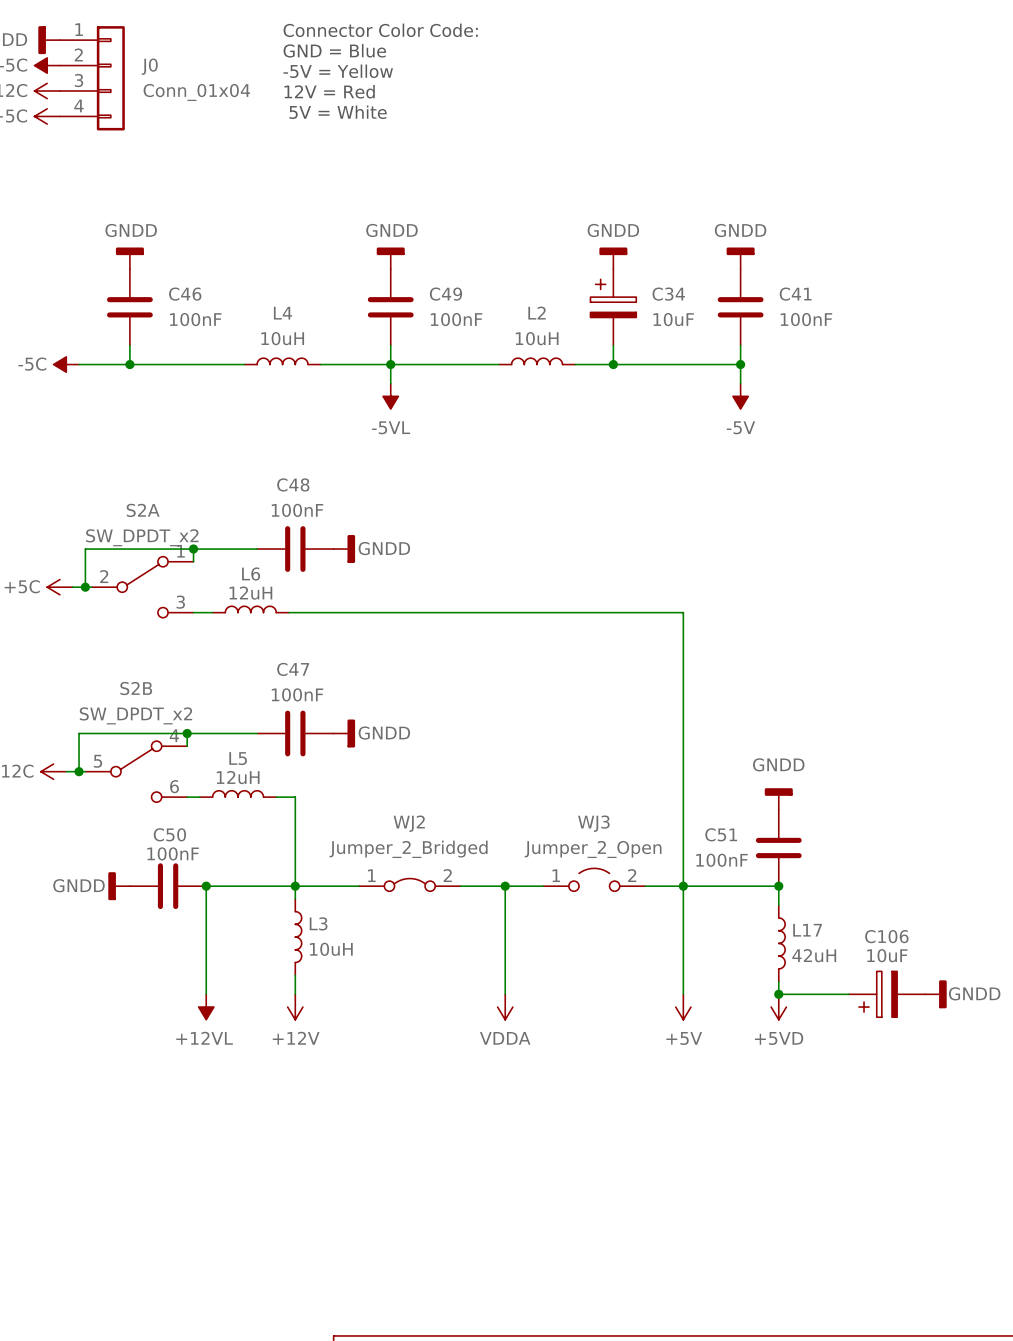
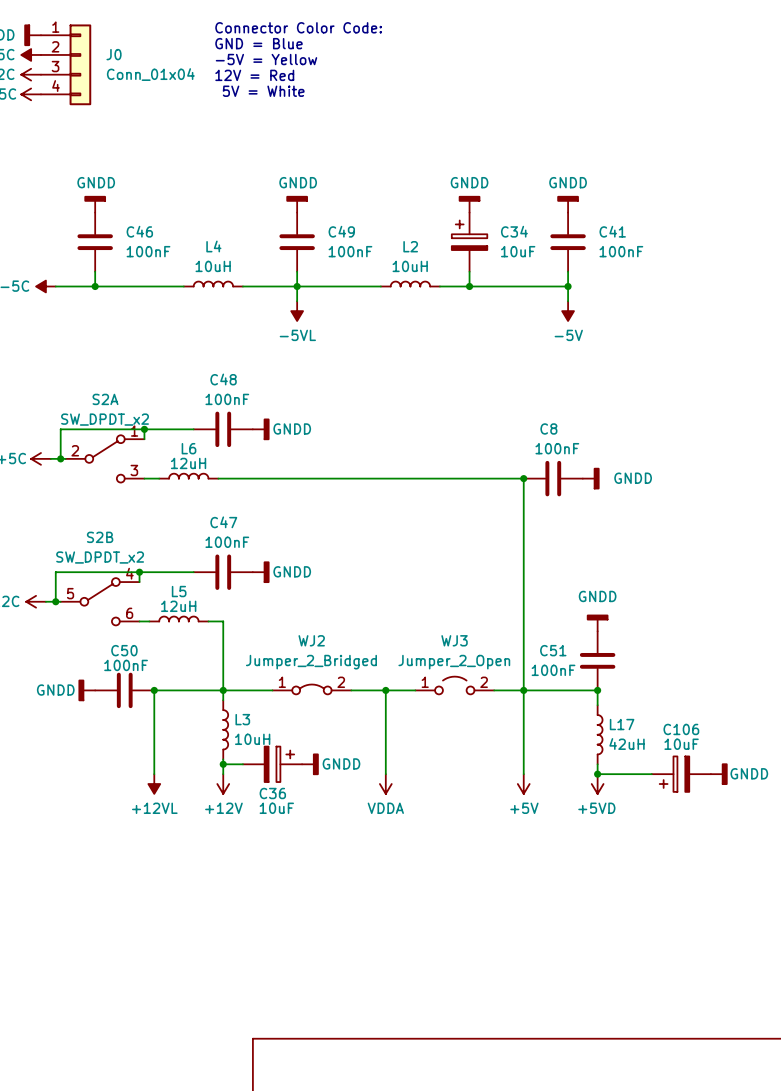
junction: none -> (523, 478)
C8: none -> 100nF (553, 478)
power symbol: none -> GNDD (591, 478)
wire: none -> (223, 764) (242, 764)
junction: none -> (223, 764)
C36: none -> 10uF (272, 764)
power symbol: none -> GNDD (310, 764)

